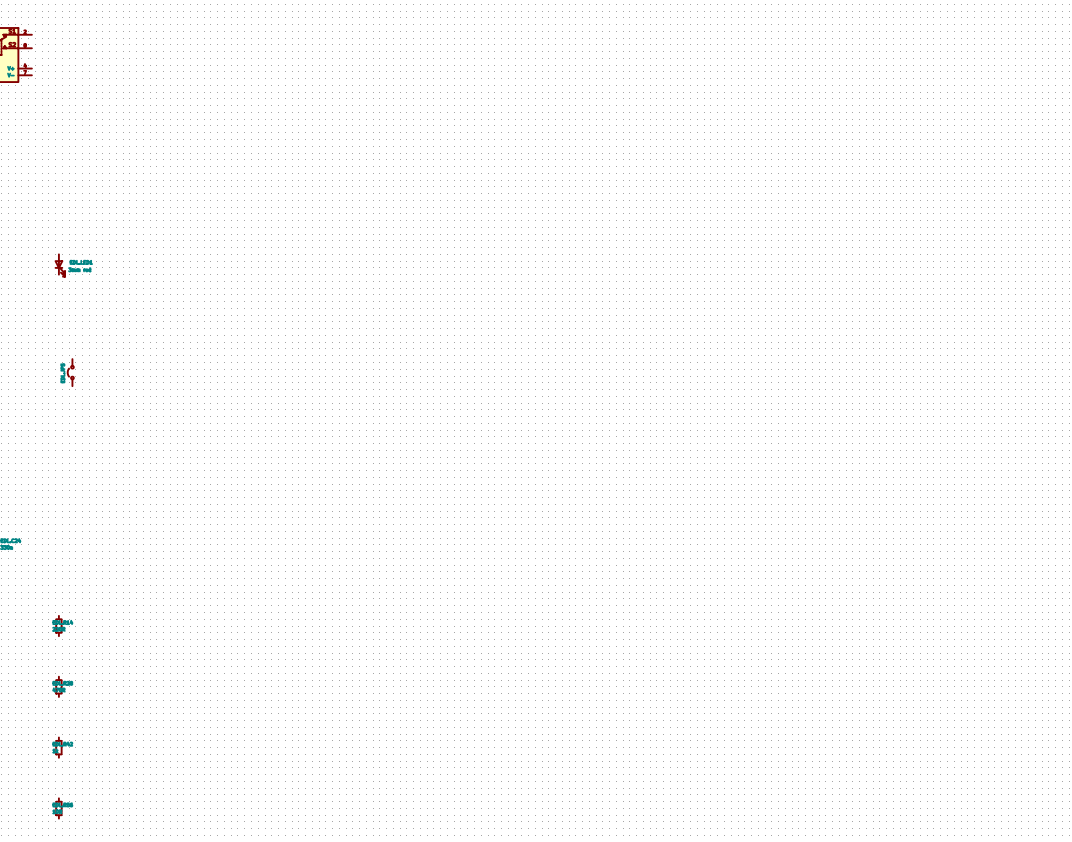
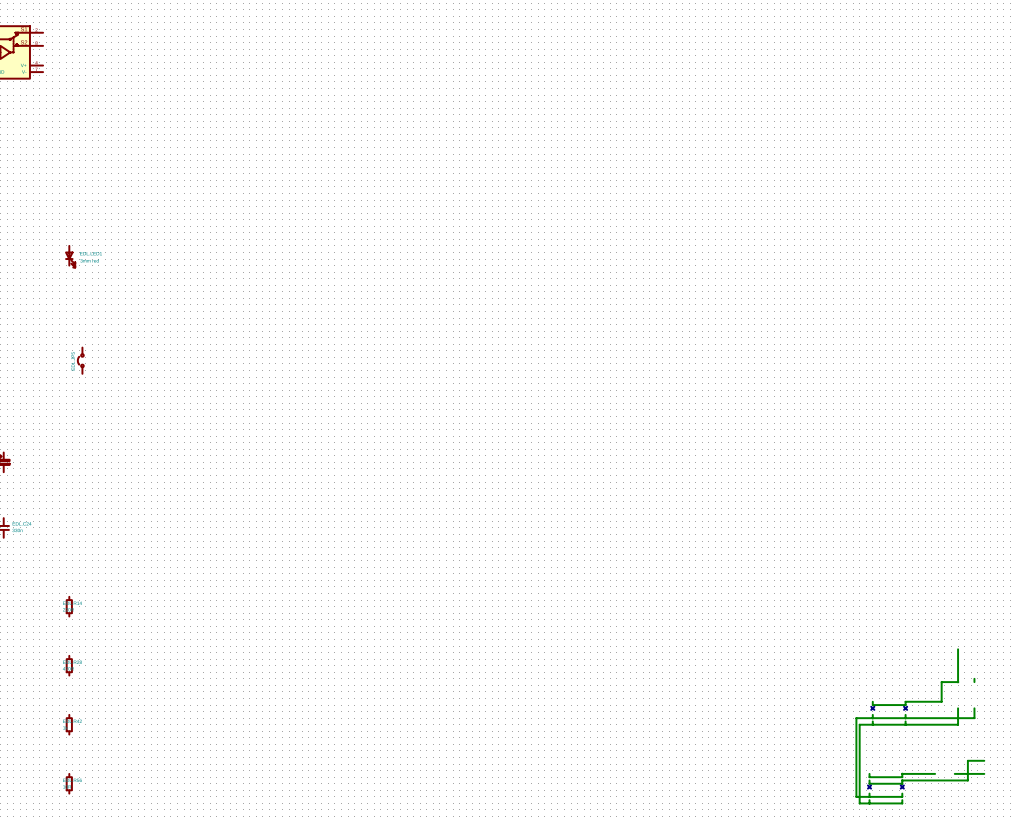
wire: none -> (958, 649) (958, 682) (941, 682) (941, 701) (905, 701) (905, 705) (872, 705) (872, 701)
wire: none -> (974, 678) (974, 682)
no-connect mark: none -> (872, 708)
no-connect mark: none -> (905, 708)
wire: none -> (958, 708) (958, 724) (859, 724) (859, 803) (902, 803) (902, 800)
wire: none -> (974, 708) (974, 718) (856, 718) (856, 796) (902, 796) (902, 793)
wire: none -> (872, 714) (872, 718)
wire: none -> (905, 714) (905, 718)
wire: none -> (872, 721) (872, 724)
wire: none -> (905, 721) (905, 724)
wire: none -> (984, 760) (967, 760) (967, 780) (902, 780) (902, 783) (869, 783) (869, 780)
wire: none -> (869, 773) (869, 777) (902, 777) (902, 773) (935, 773)
wire: none -> (954, 773) (984, 773)
no-connect mark: none -> (869, 787)
no-connect mark: none -> (902, 787)
wire: none -> (869, 793) (869, 796)
wire: none -> (869, 800) (869, 803)

